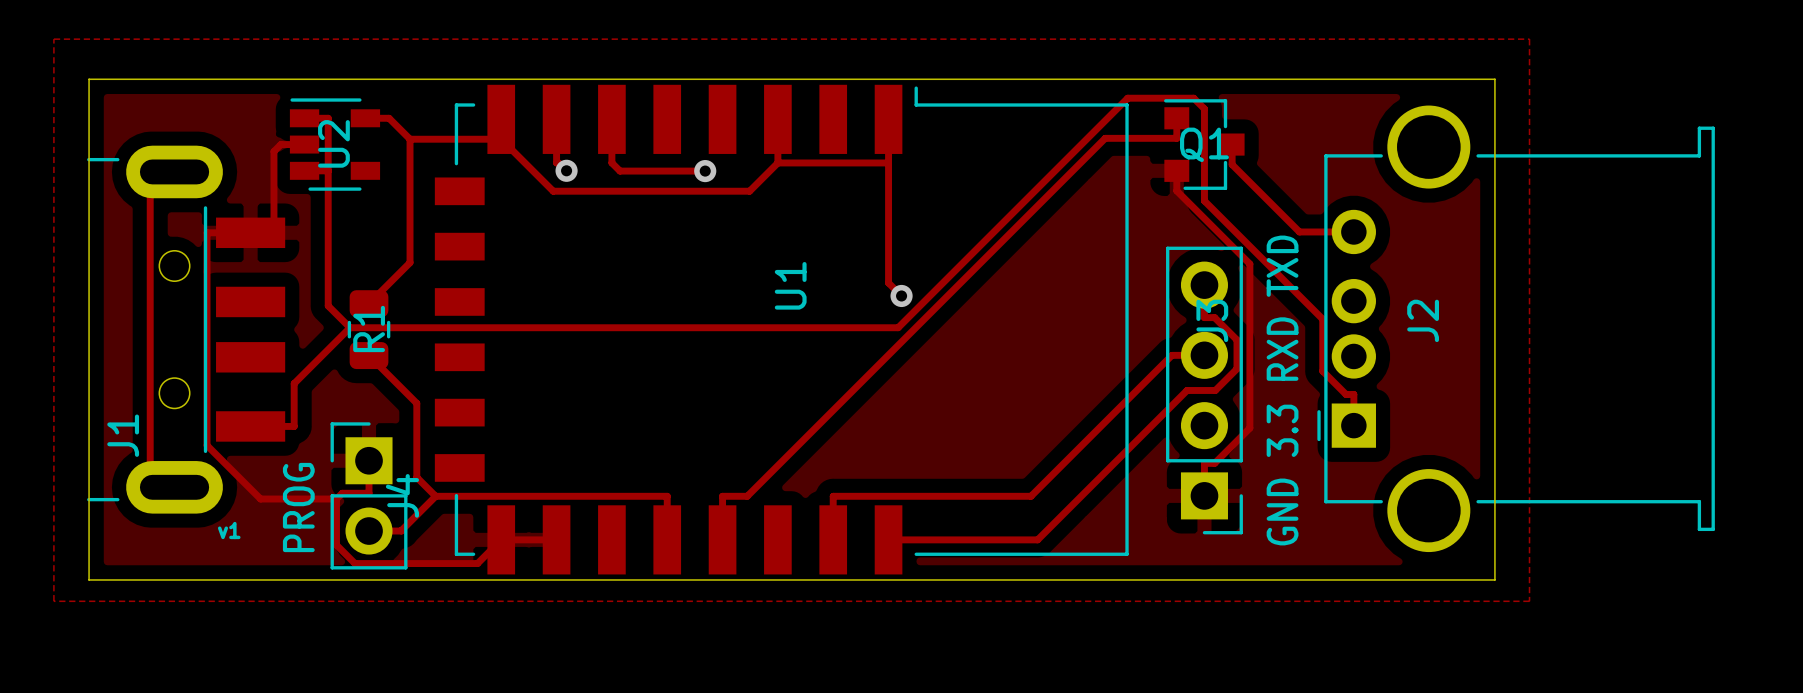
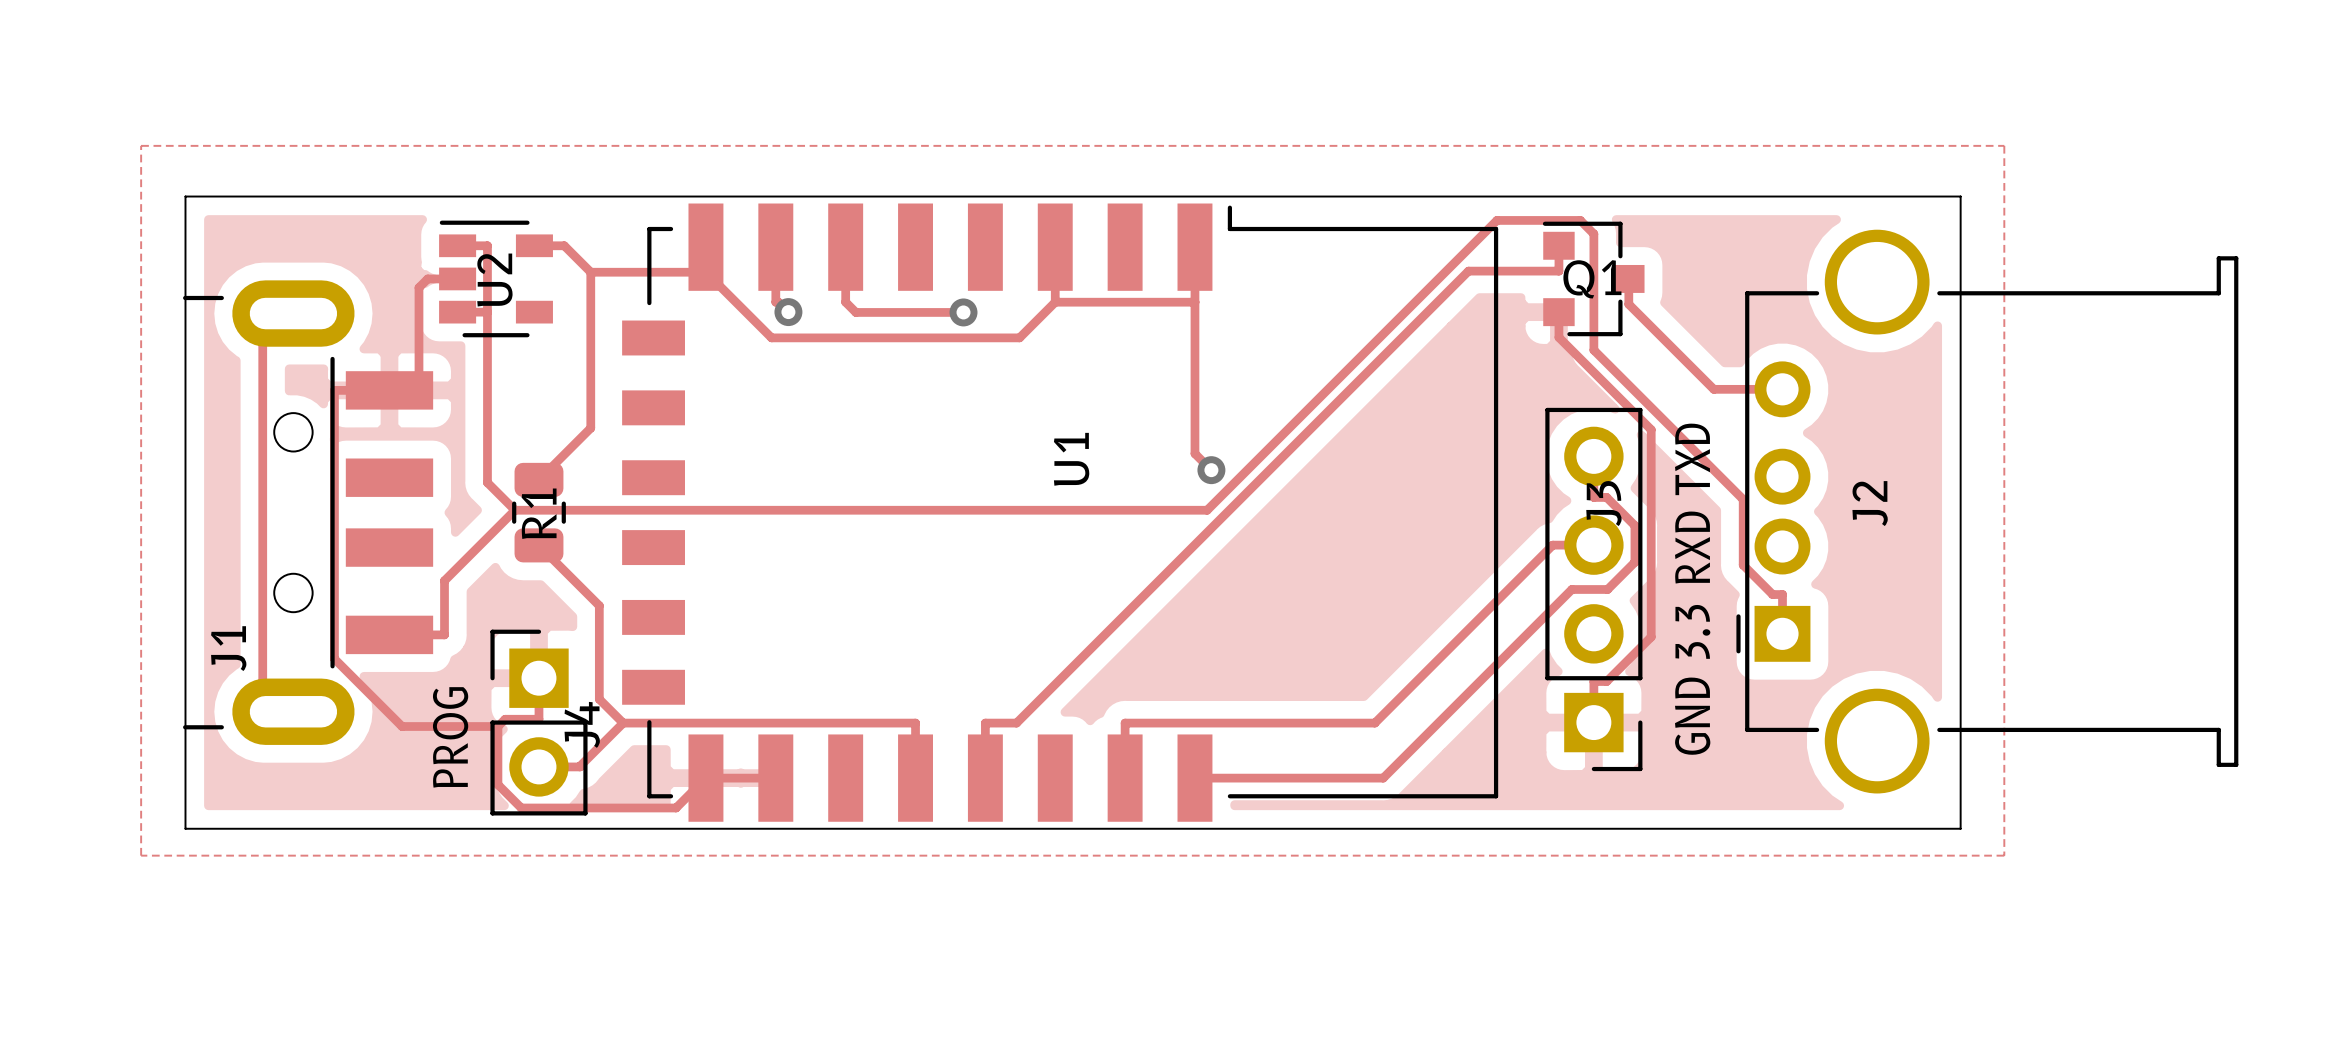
text: v1 (229, 530) -> none

